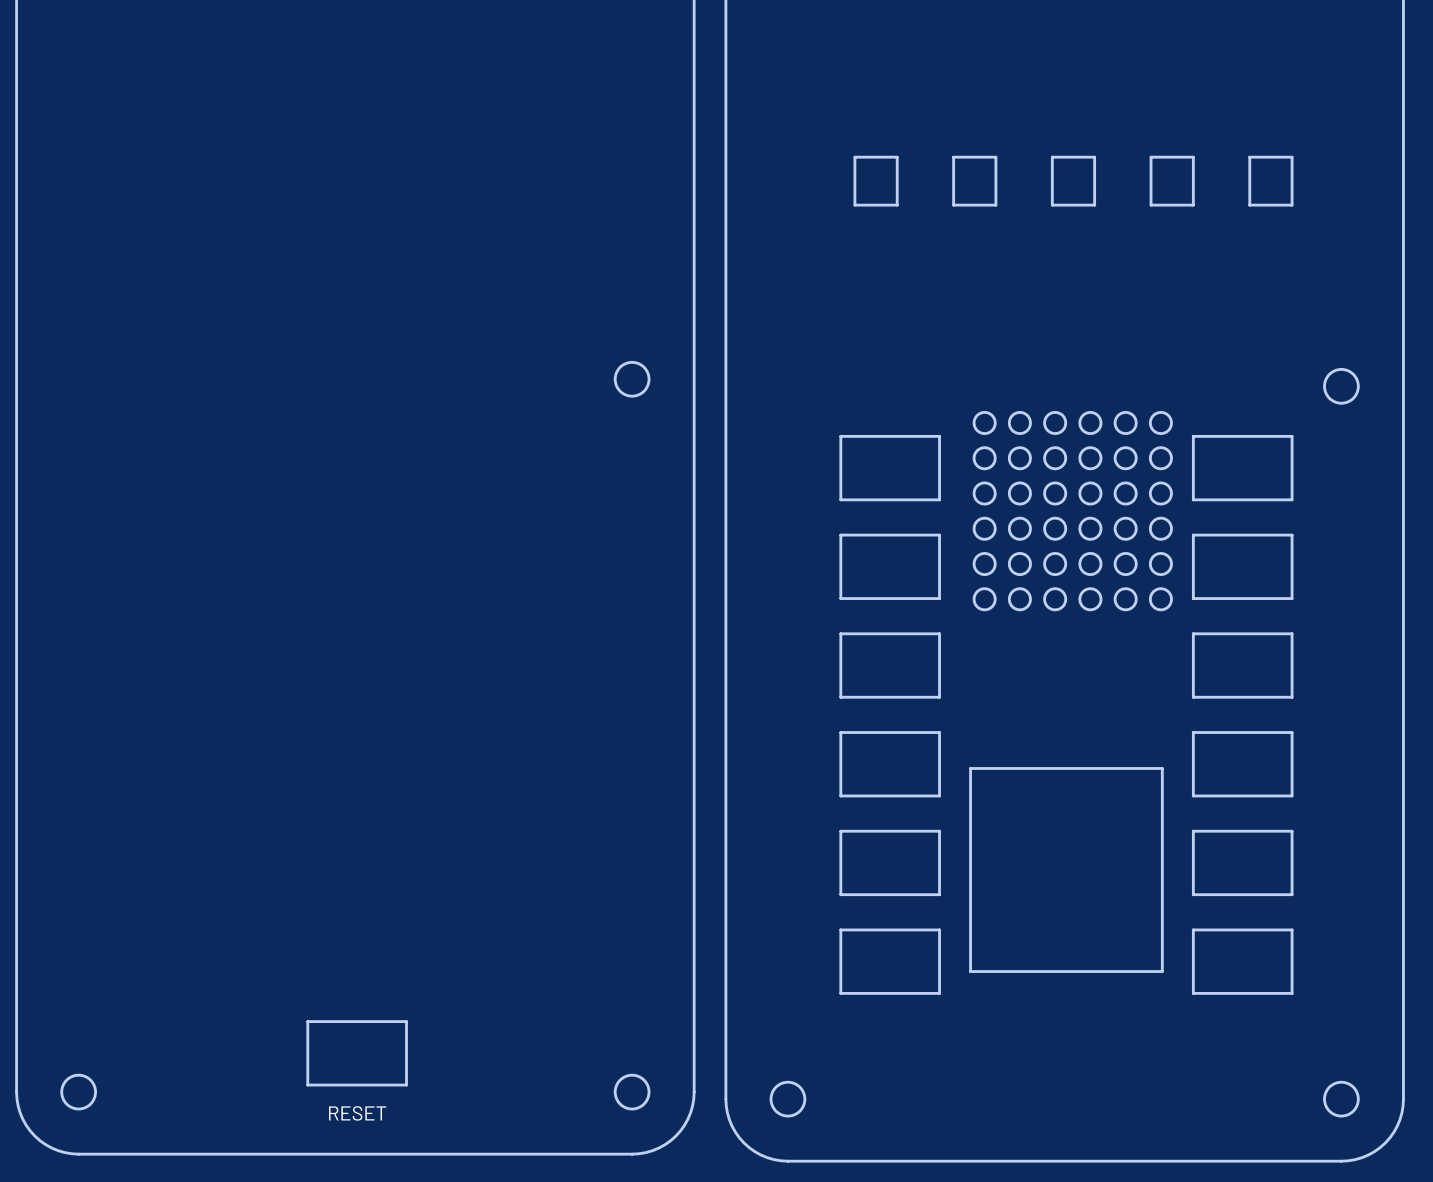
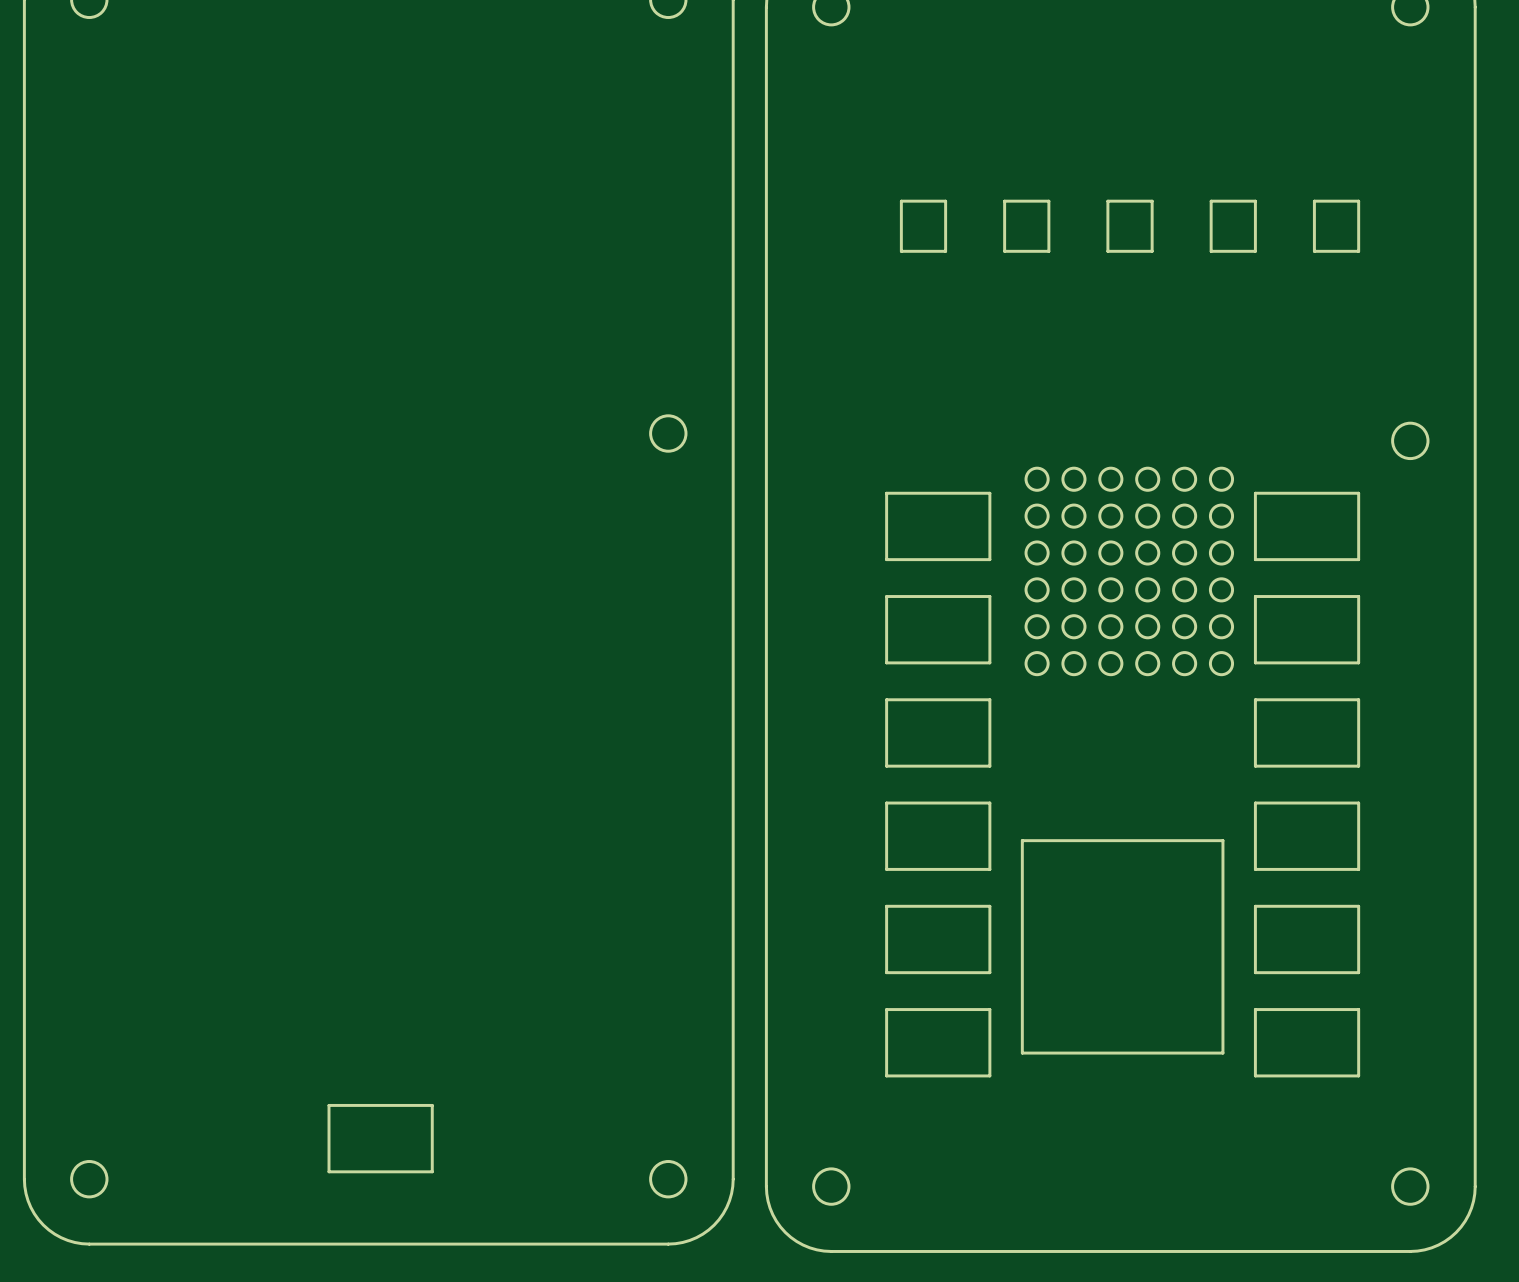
text: RESET (357, 1113) -> none

